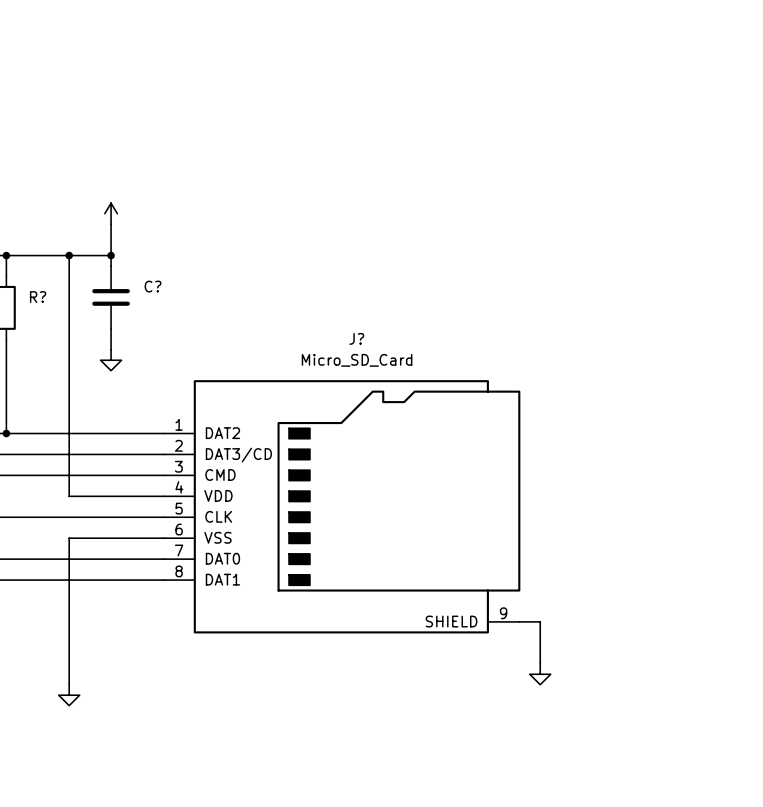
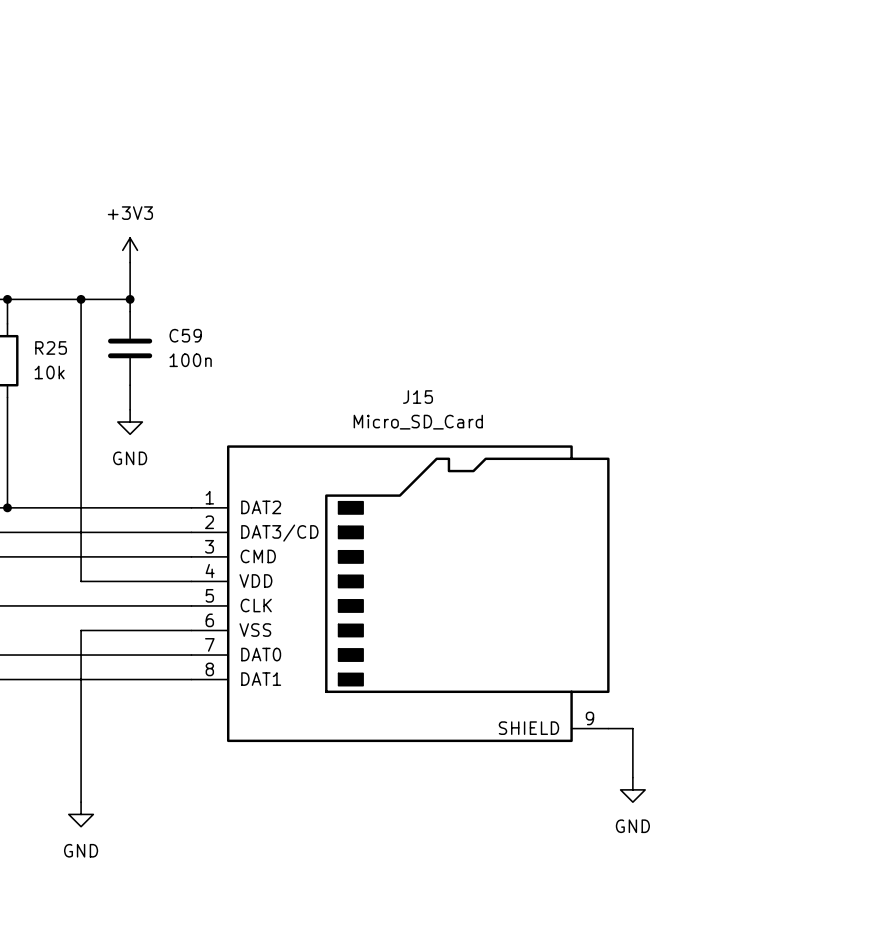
power symbol text: none -> +3V3 (130, 213)
C? name: C? (153, 286) -> C59 (185, 335)
R? name: R? (38, 297) -> R25 (51, 347)
C? value: none -> 100n (190, 360)
R? value: none -> 10k (49, 372)
J? name: J? (356, 338) -> J15 (417, 397)
power symbol text: none -> GND (130, 458)
power symbol text: none -> GND (632, 826)
power symbol text: none -> GND (81, 850)

